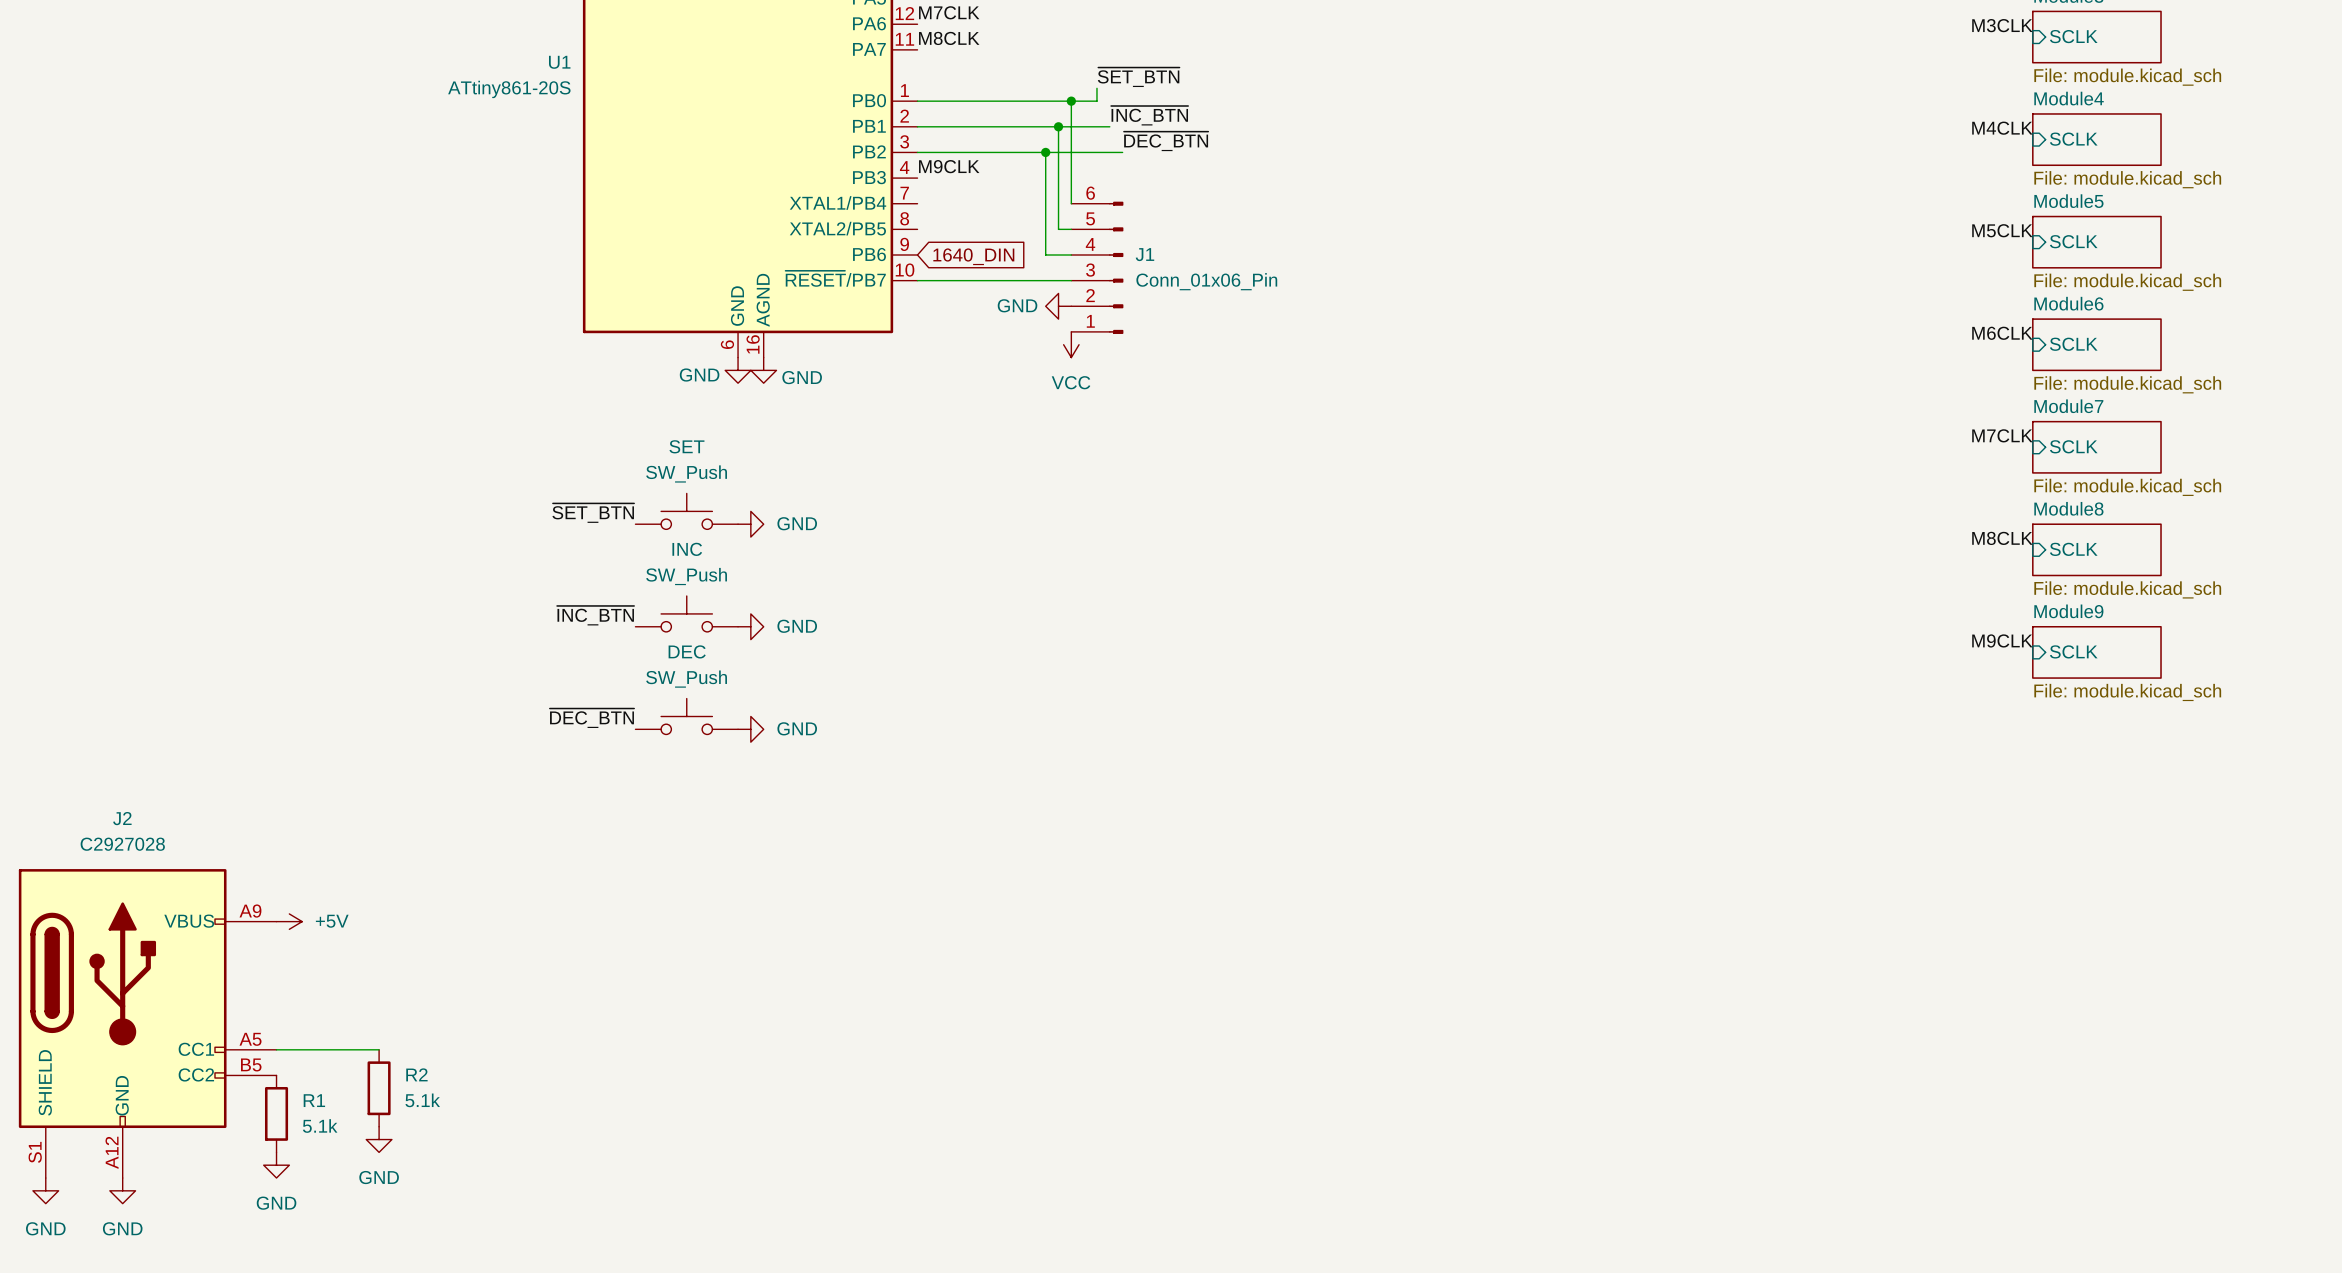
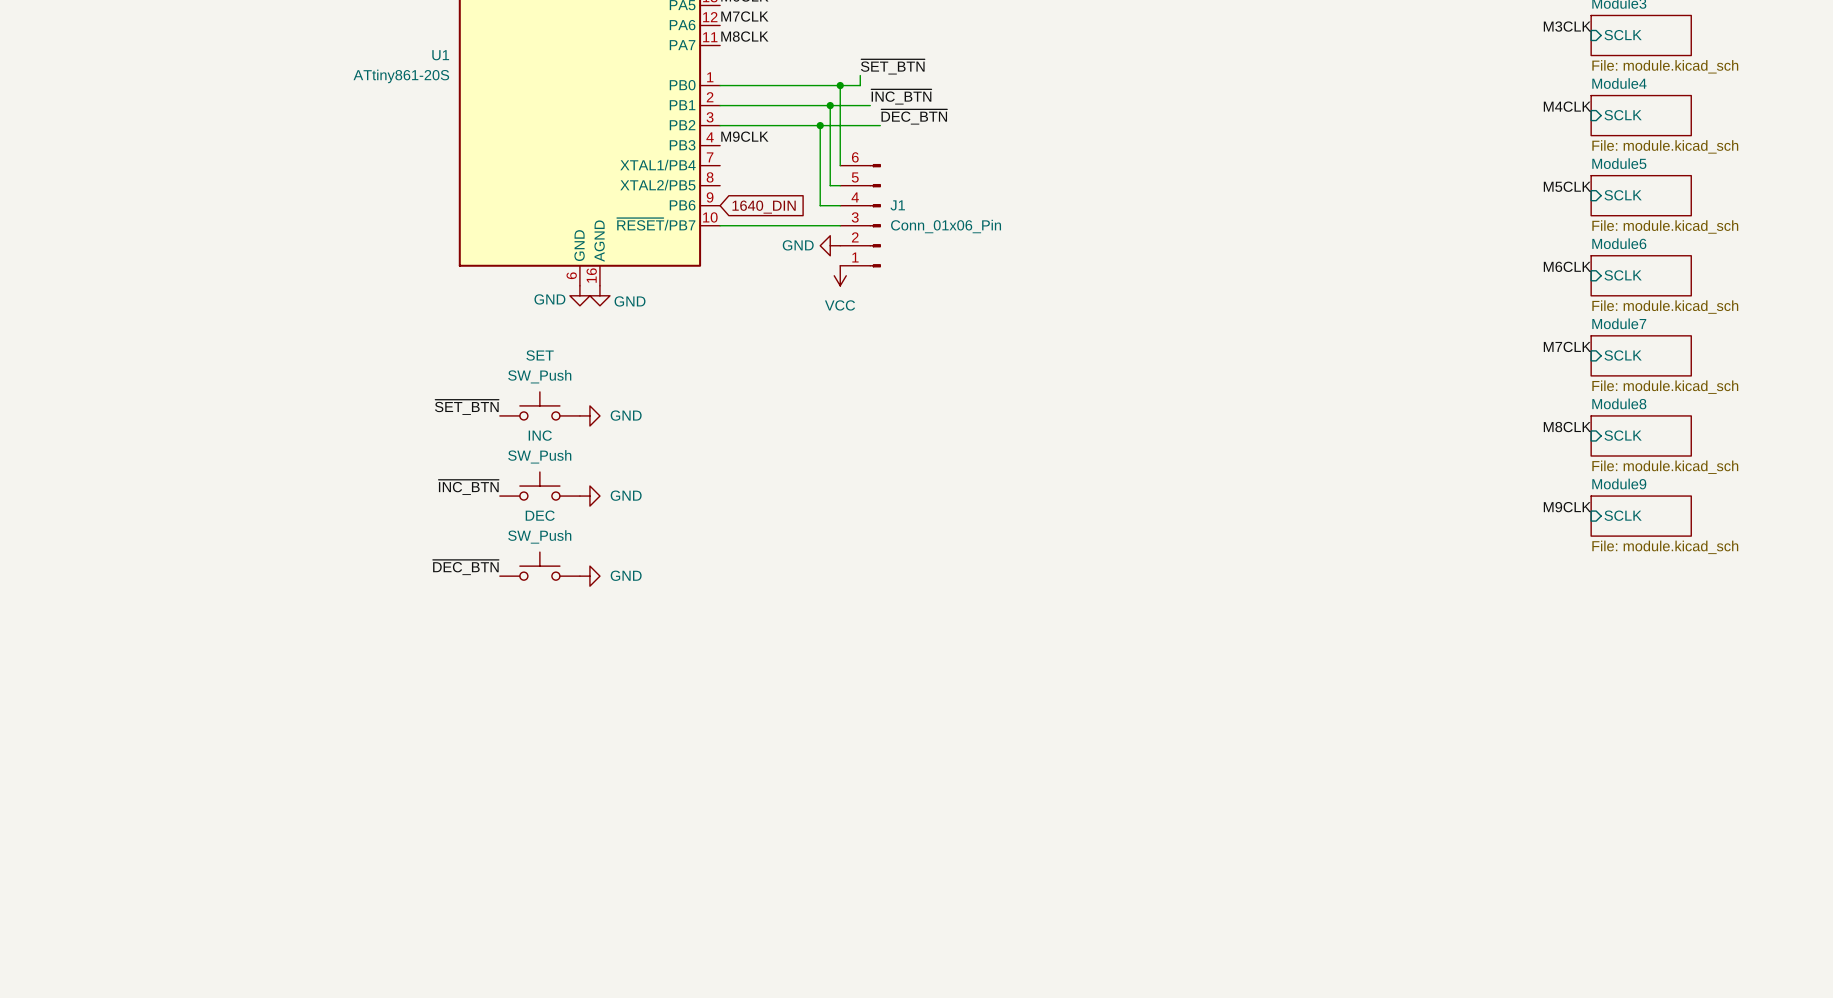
power symbol: +5V (289, 921) -> none
J2: C2927028 (147, 1023) -> none
wire: (276, 1049) (379, 1049) -> none
R2: 5.1k (379, 1088) -> none
R1: 5.1k (276, 1113) -> none
power symbol: GND (379, 1139) -> none
power symbol: GND (276, 1165) -> none
power symbol: GND (45, 1190) -> none
power symbol: GND (122, 1190) -> none

